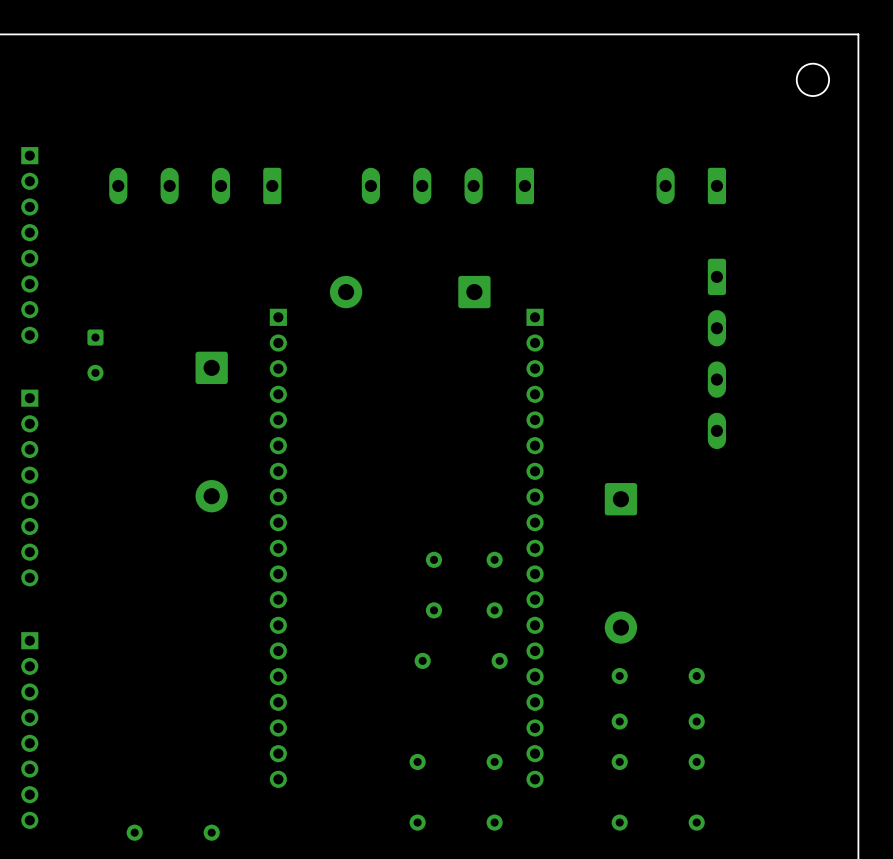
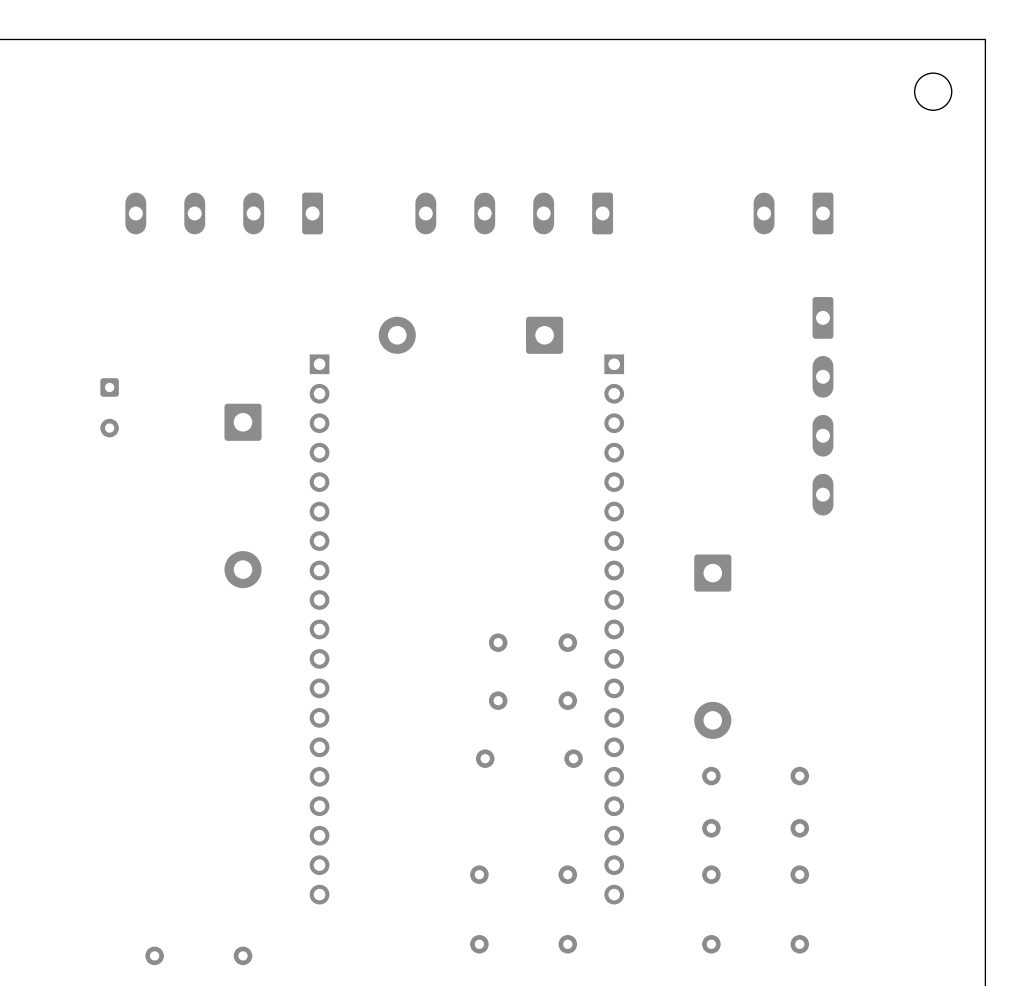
part: (29, 245) -> none
part: (29, 488) -> none
part: (29, 730) -> none

